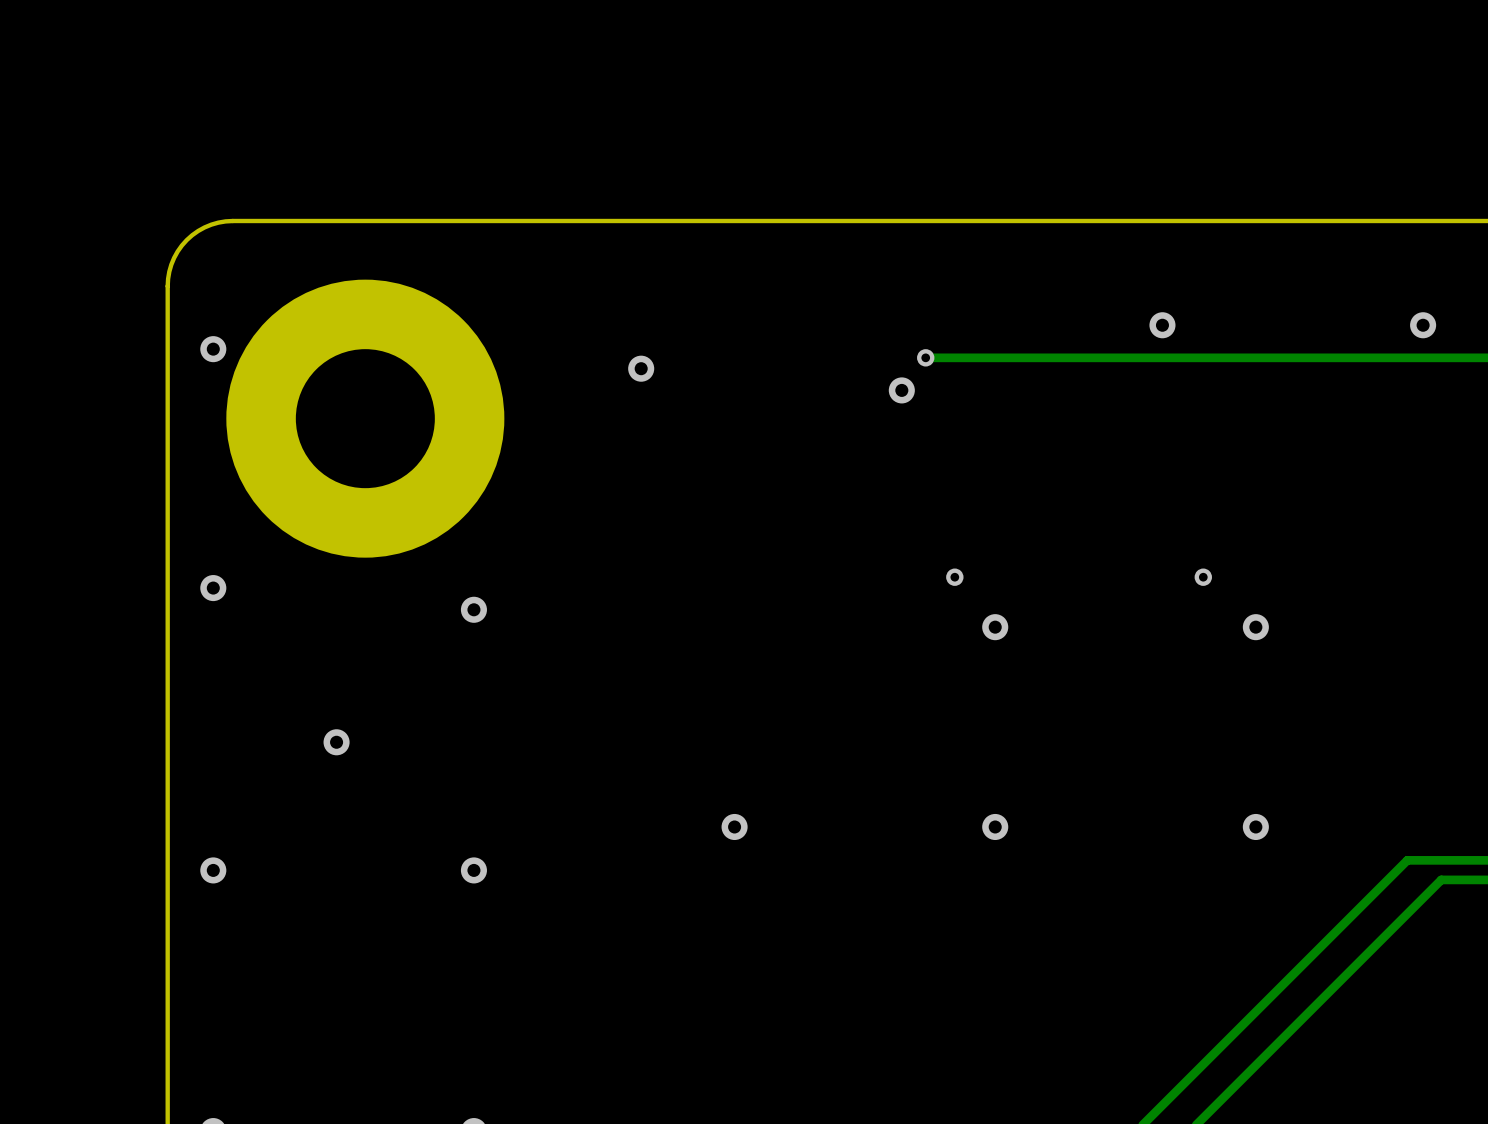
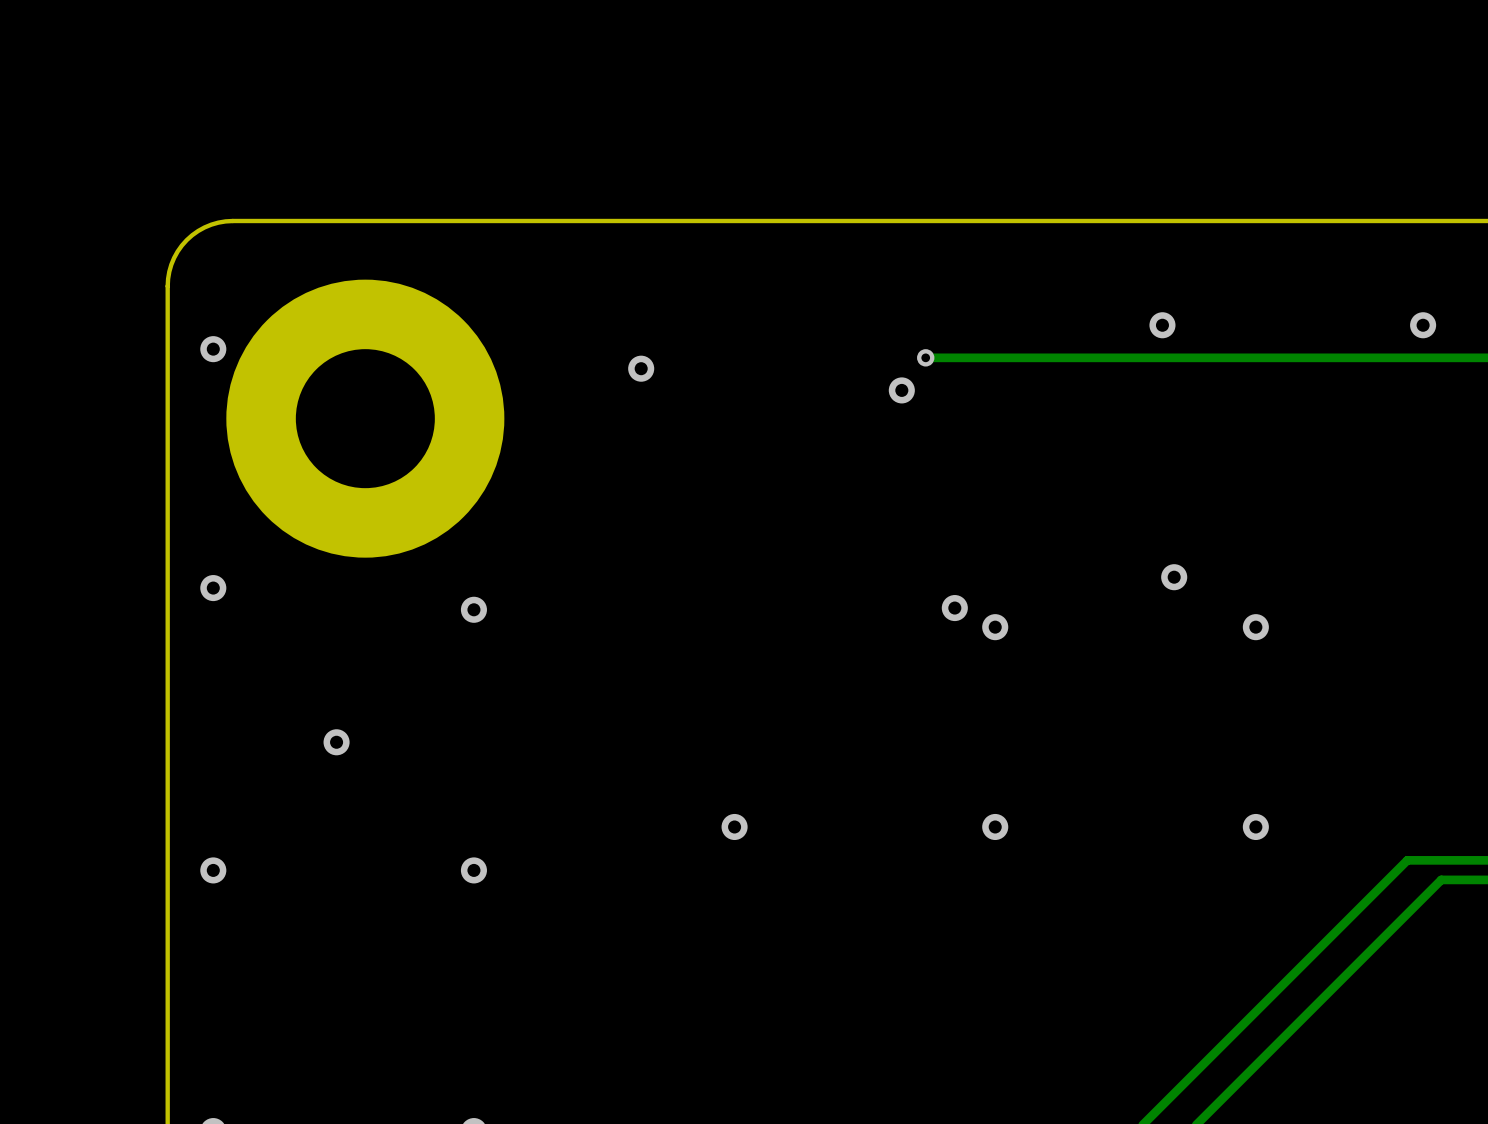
via: (954, 577) -> none
via: none -> (1174, 577)
via: (1203, 577) -> none
via: none -> (954, 608)

